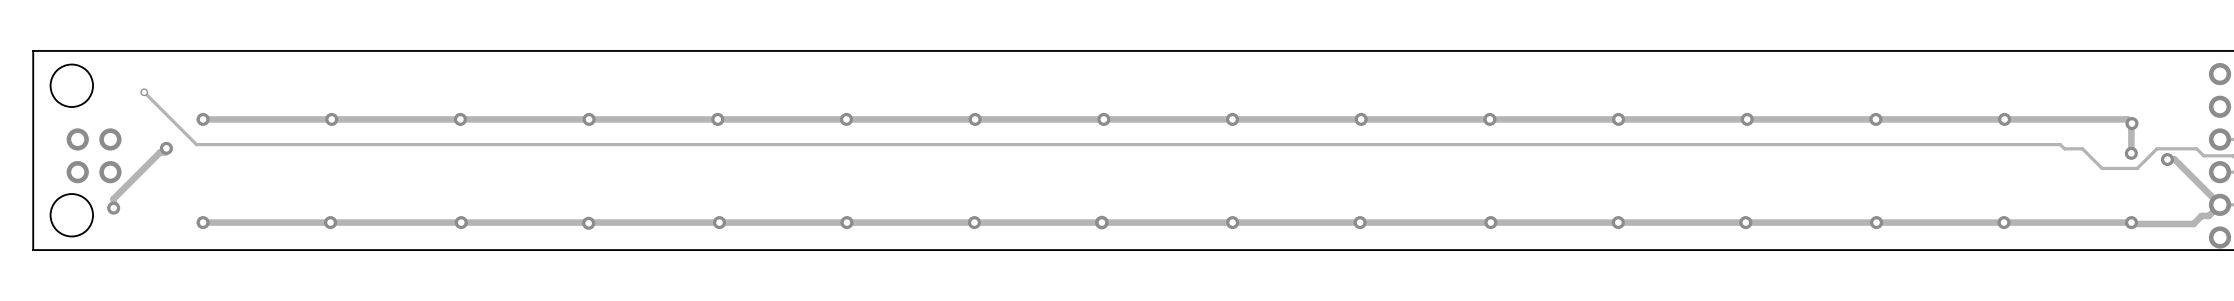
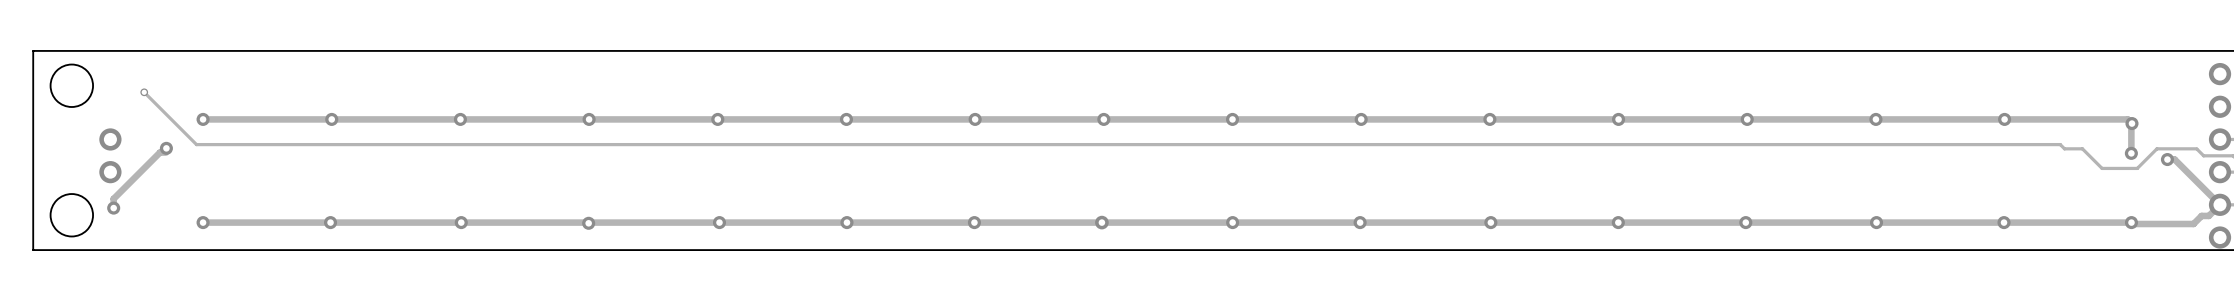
part: (77, 139) -> none
part: (77, 172) -> none

